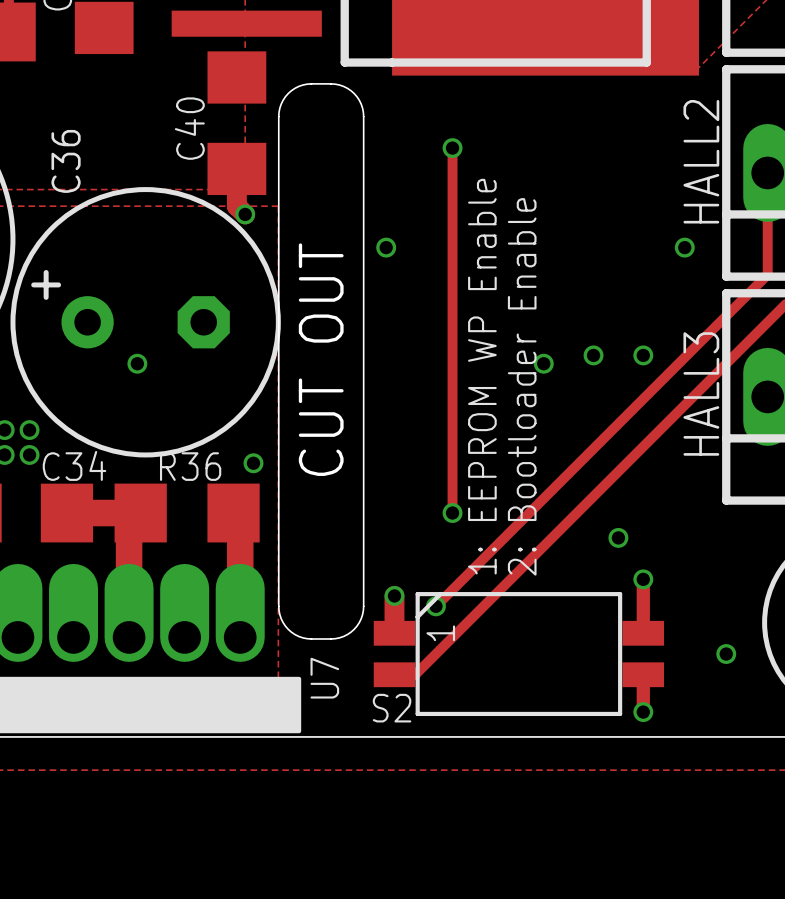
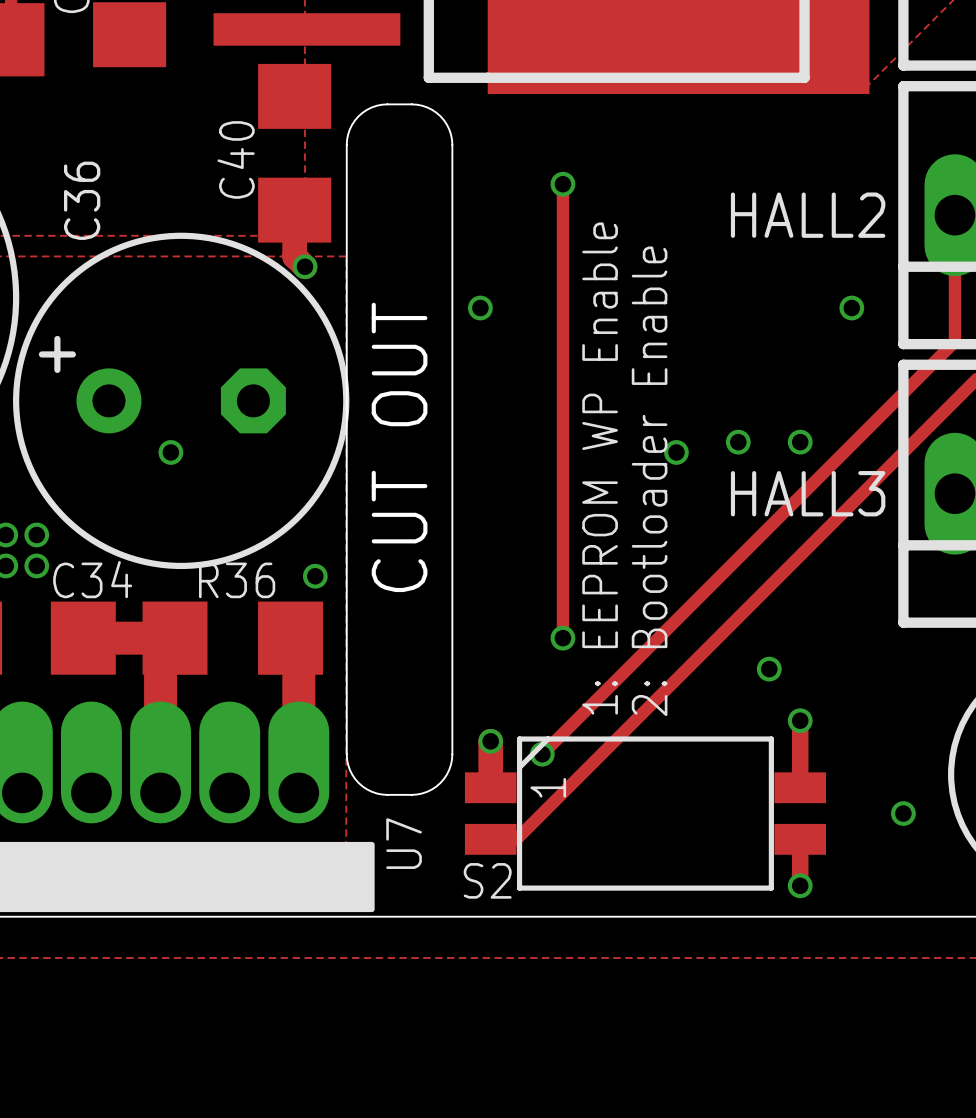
HALL2 name rotation: 0° (701, 161) -> 90° clockwise (808, 215)
HALL3 name rotation: 0° (701, 393) -> 90° clockwise (808, 493)

